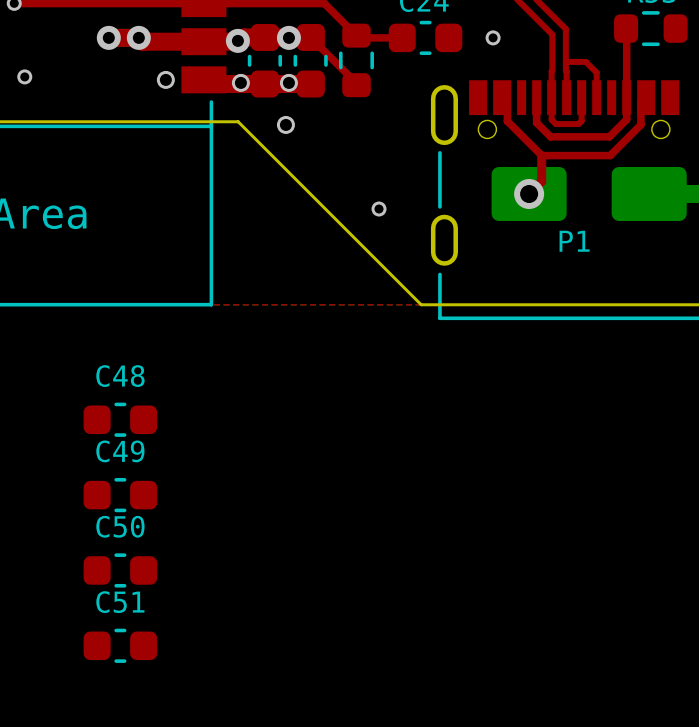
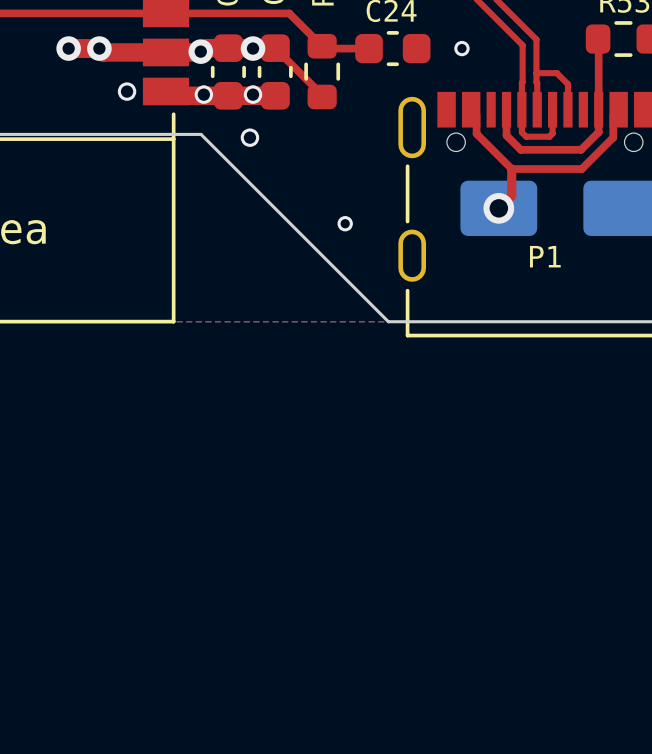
C48: (120, 419) -> none
C49: (120, 495) -> none
C50: (120, 570) -> none
C51: (120, 645) -> none

